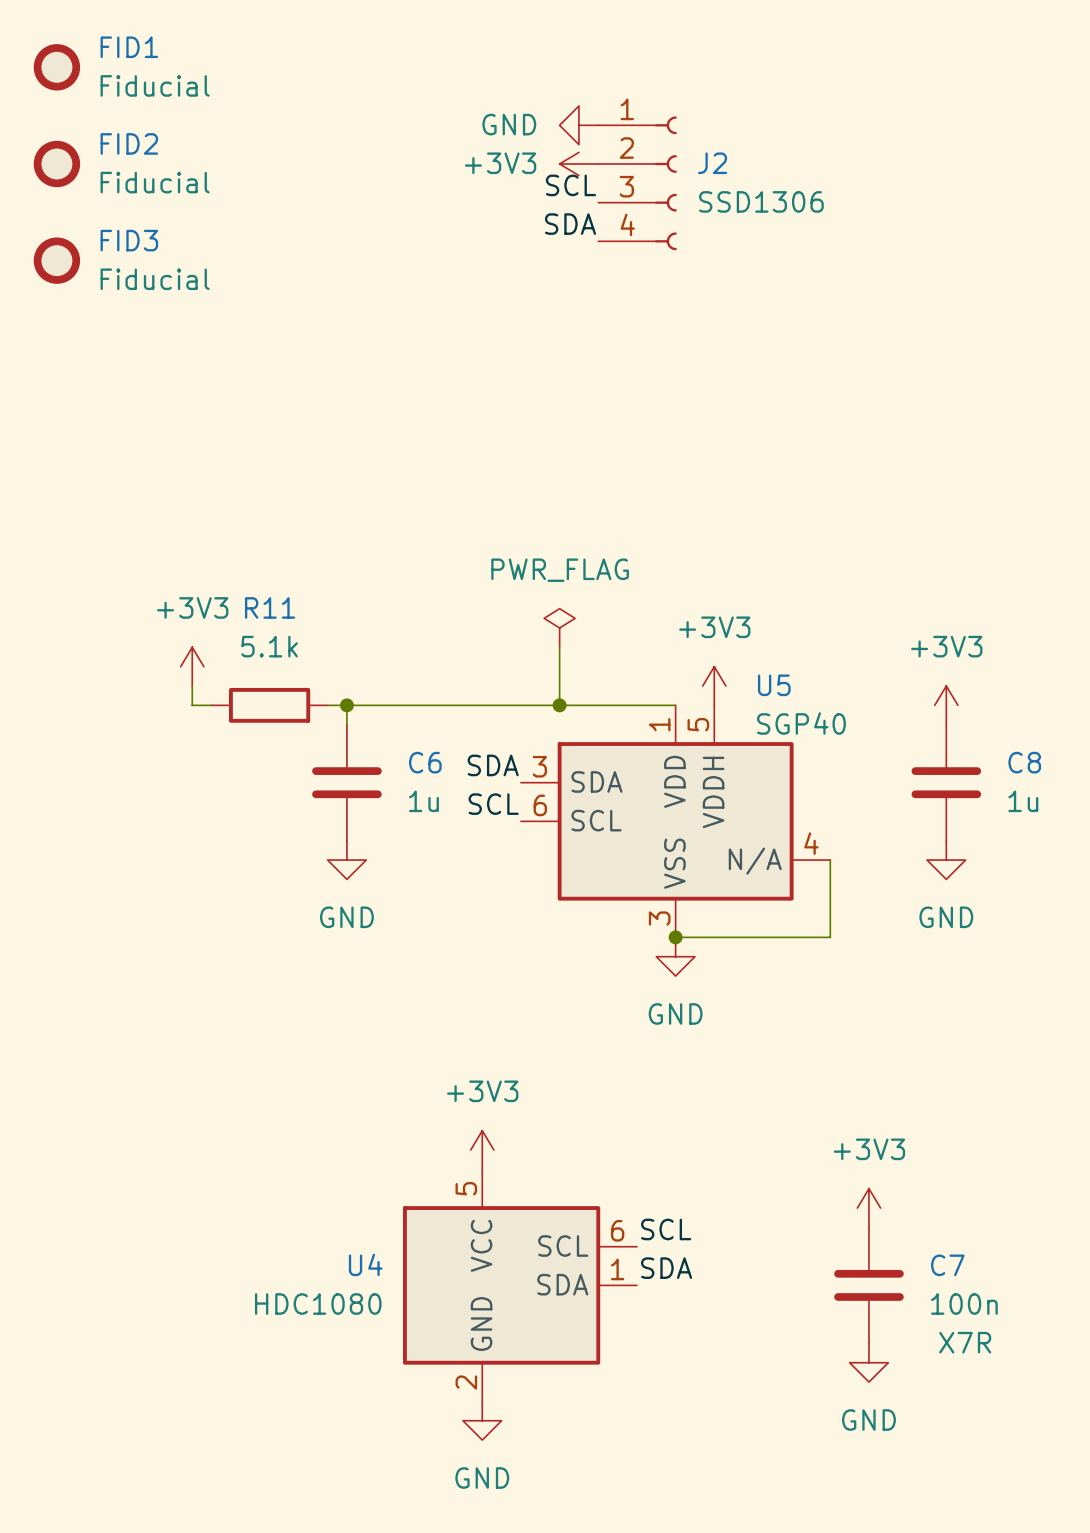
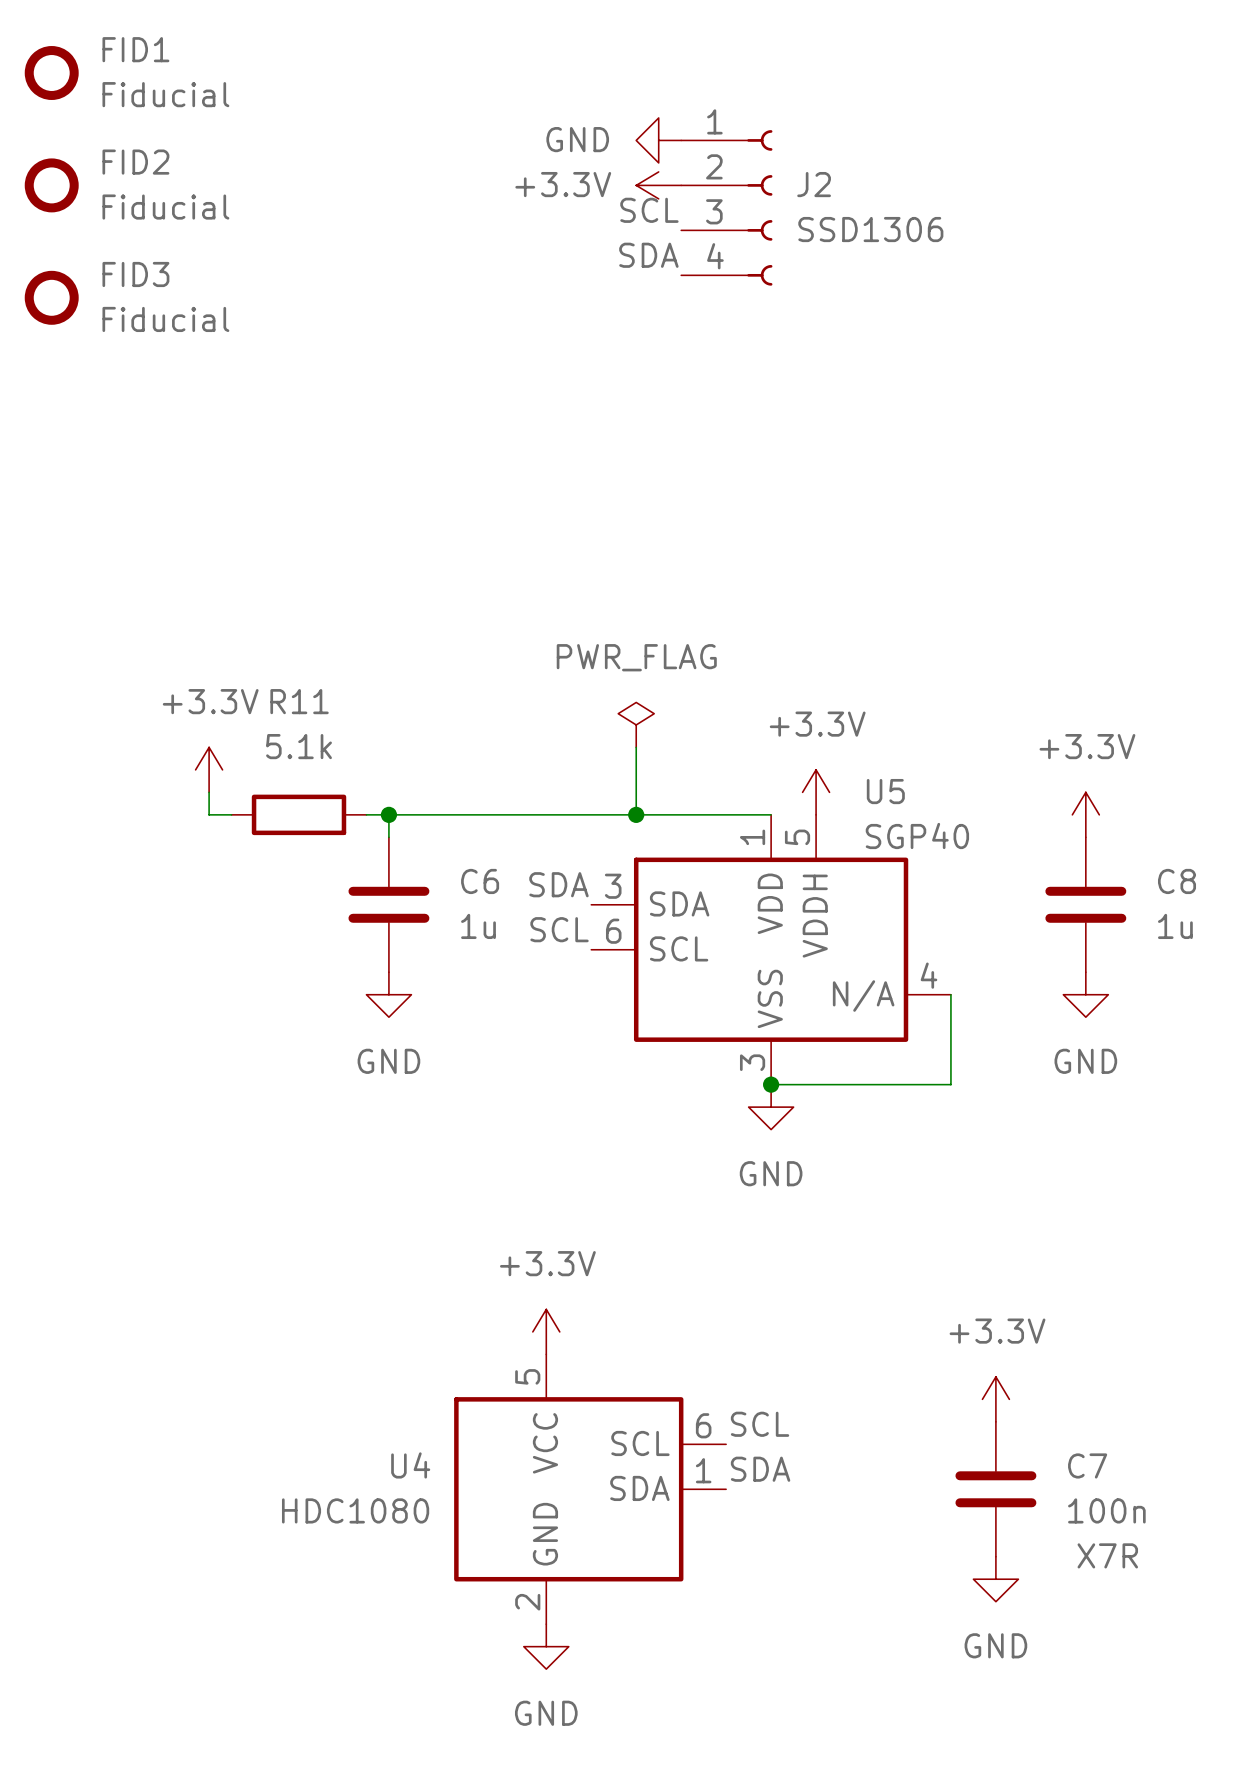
power symbol: +3V3 (578, 163) -> +3.3V (658, 185)
power symbol: +3V3 (192, 666) -> +3.3V (209, 769)
power symbol: +3V3 (714, 686) -> +3.3V (816, 792)
power symbol: +3V3 (946, 705) -> +3.3V (1085, 814)
power symbol: +3V3 (482, 1150) -> +3.3V (546, 1331)
power symbol: +3V3 (868, 1208) -> +3.3V (995, 1399)

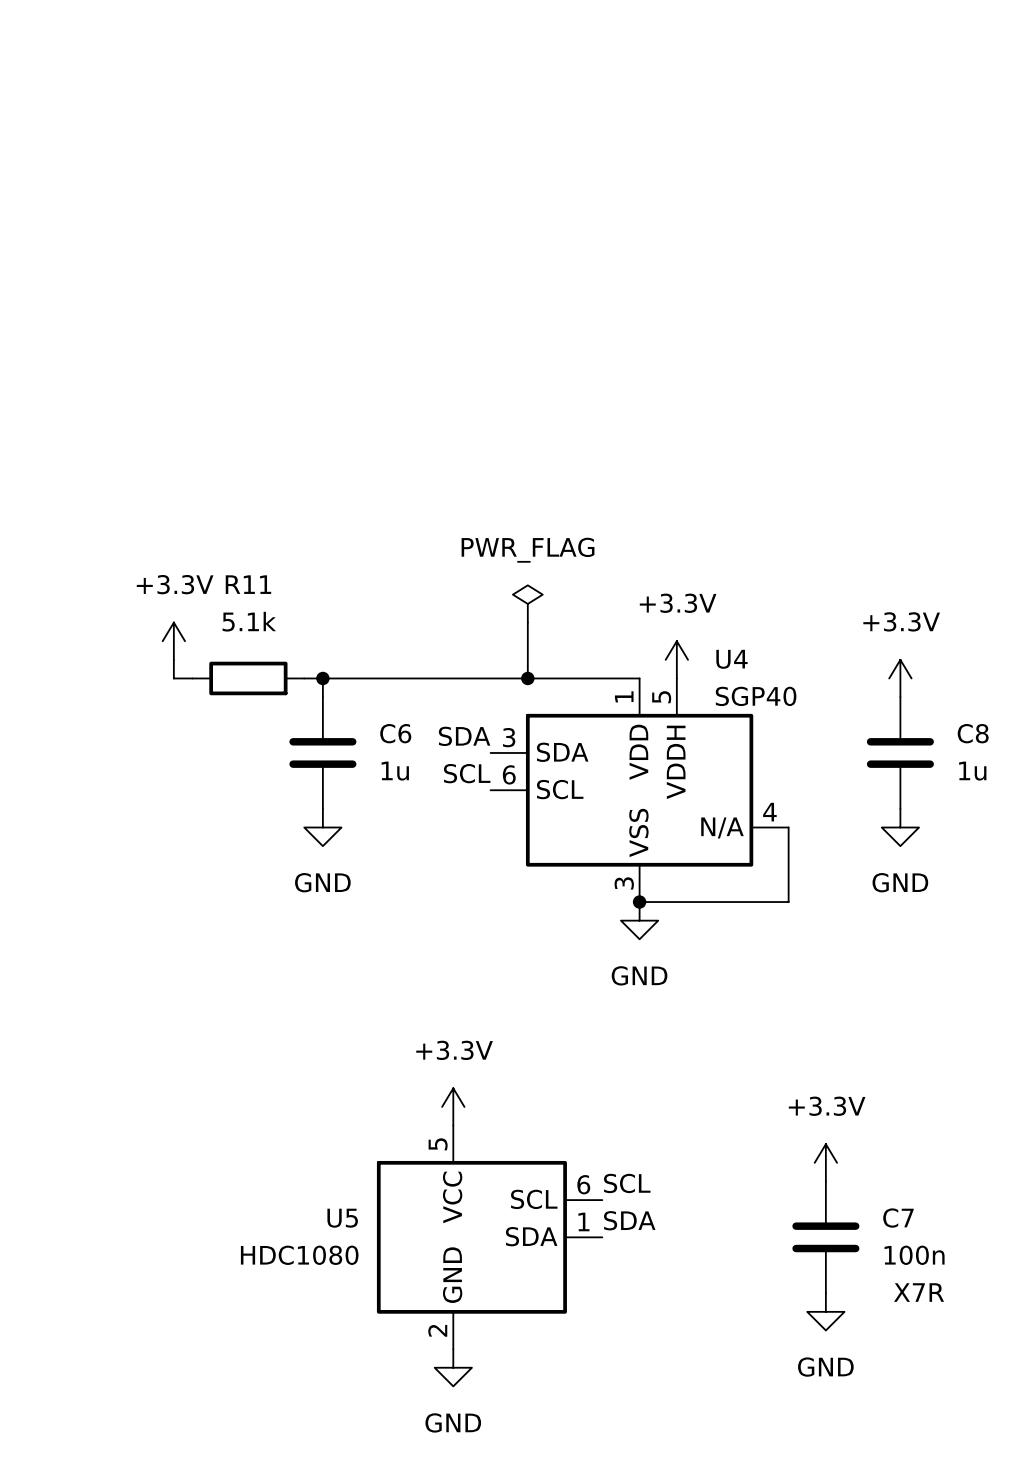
FID1: Fiducial (51, 73) -> none
power symbol: GND (658, 140) -> none
FID2: Fiducial (51, 185) -> none
power symbol: +3.3V (658, 185) -> none
J2: SSD1306 (726, 207) -> none
label: SCL (649, 210) -> none
label: SDA (648, 255) -> none
FID3: Fiducial (51, 297) -> none
U5 name: U5 (885, 791) -> U4 (731, 659)
U4 name: U4 (410, 1465) -> U5 (342, 1218)

